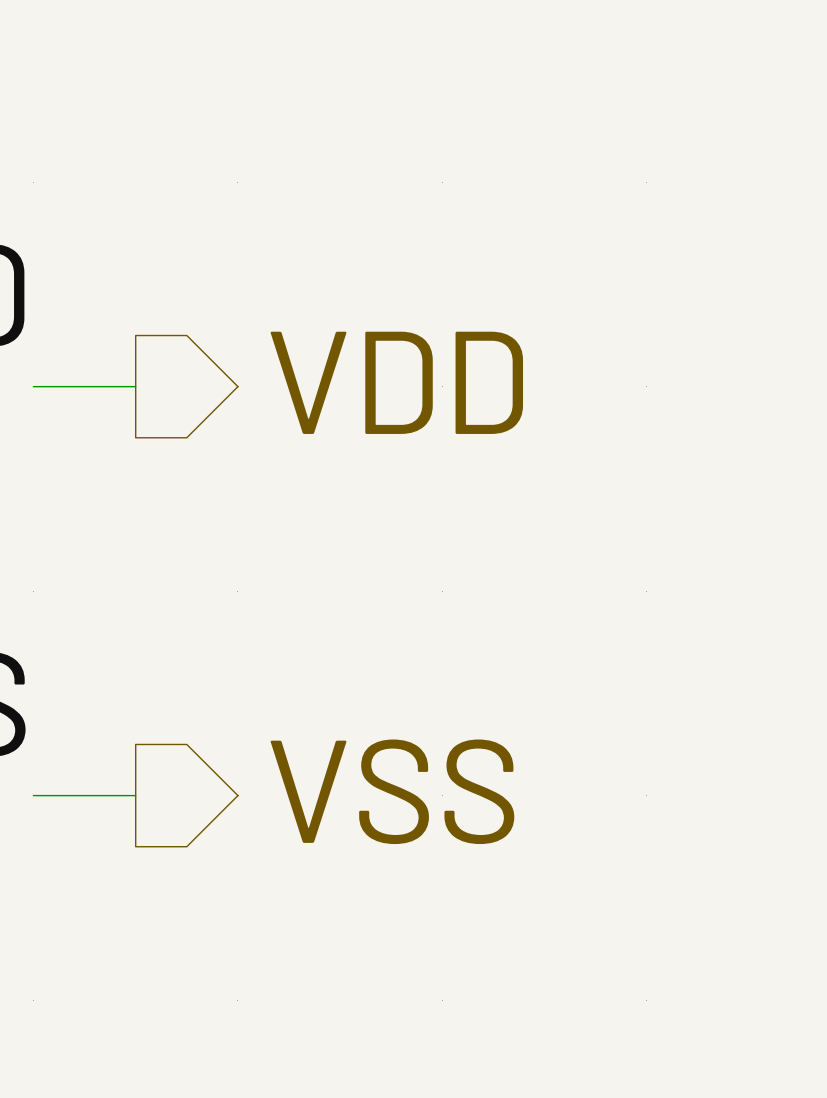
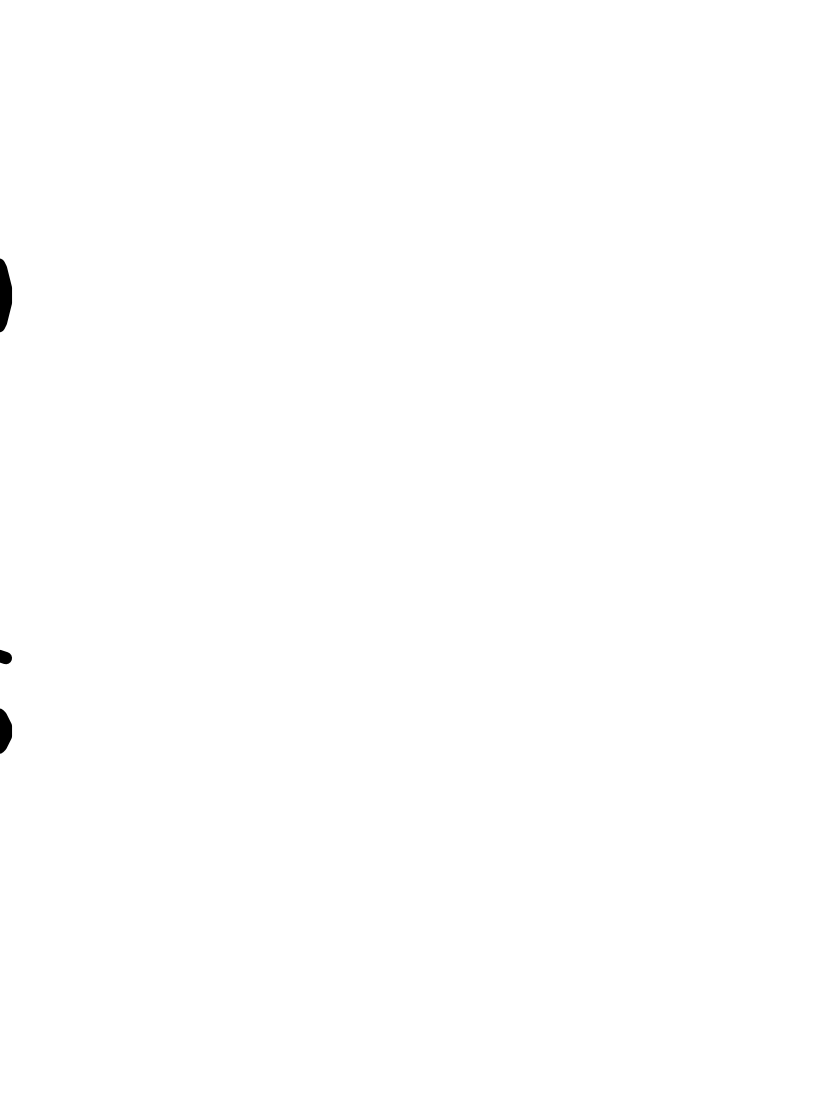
hierarchical label: VDD (396, 382) -> none
wire: (33, 386) (135, 386) -> none
hierarchical label: VSS (392, 791) -> none
wire: (33, 795) (135, 795) -> none

